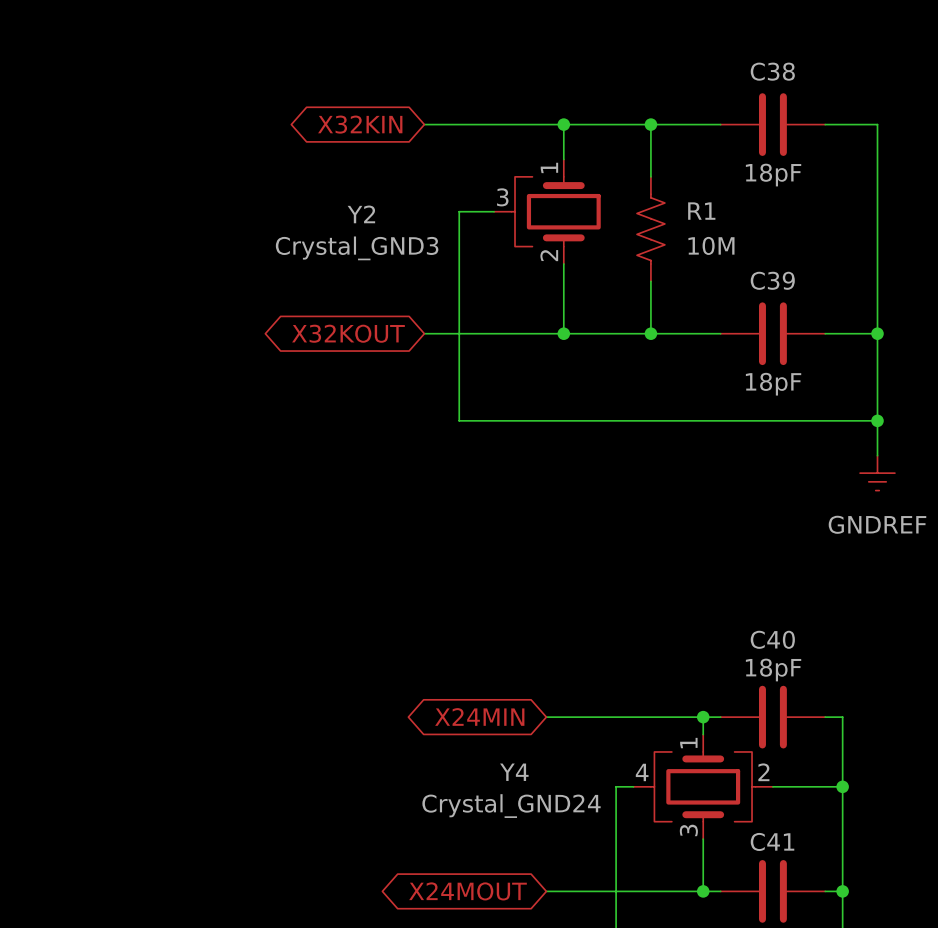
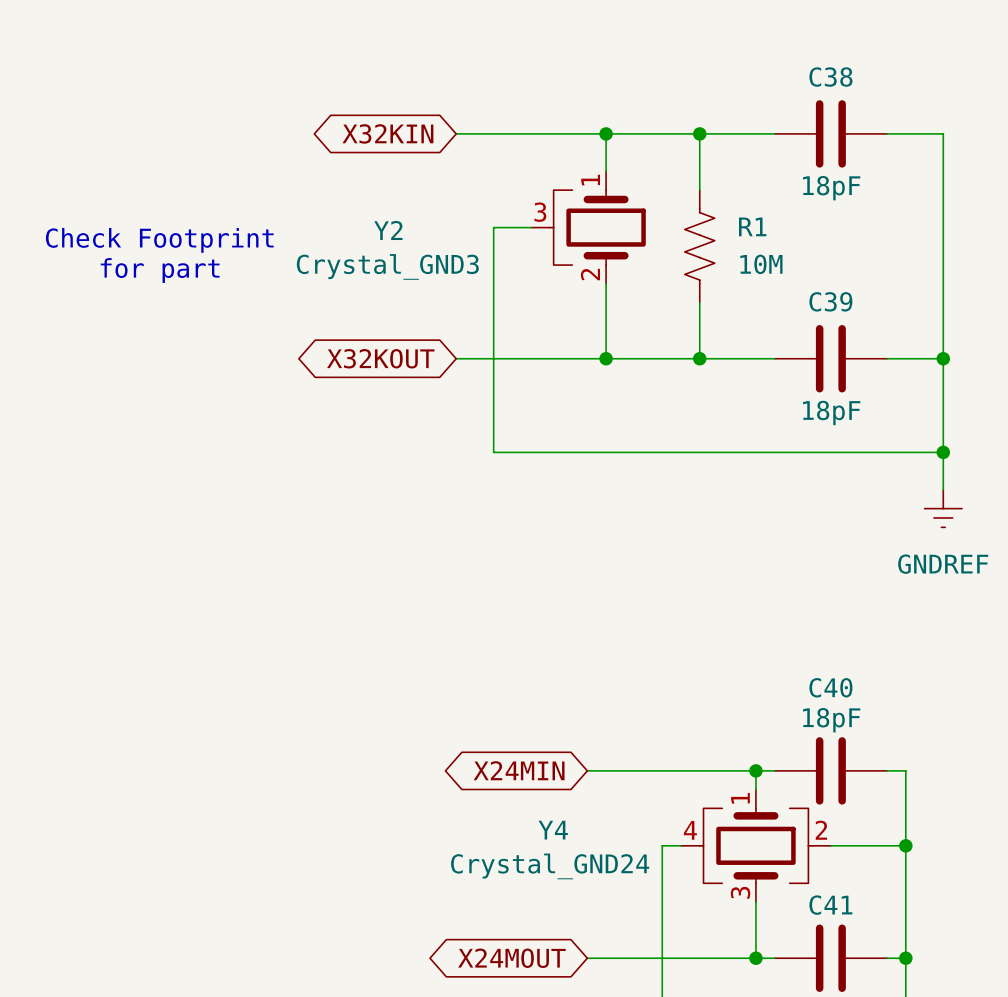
text: none -> Check Footprint (159, 240)
text: none -> for part (160, 270)

